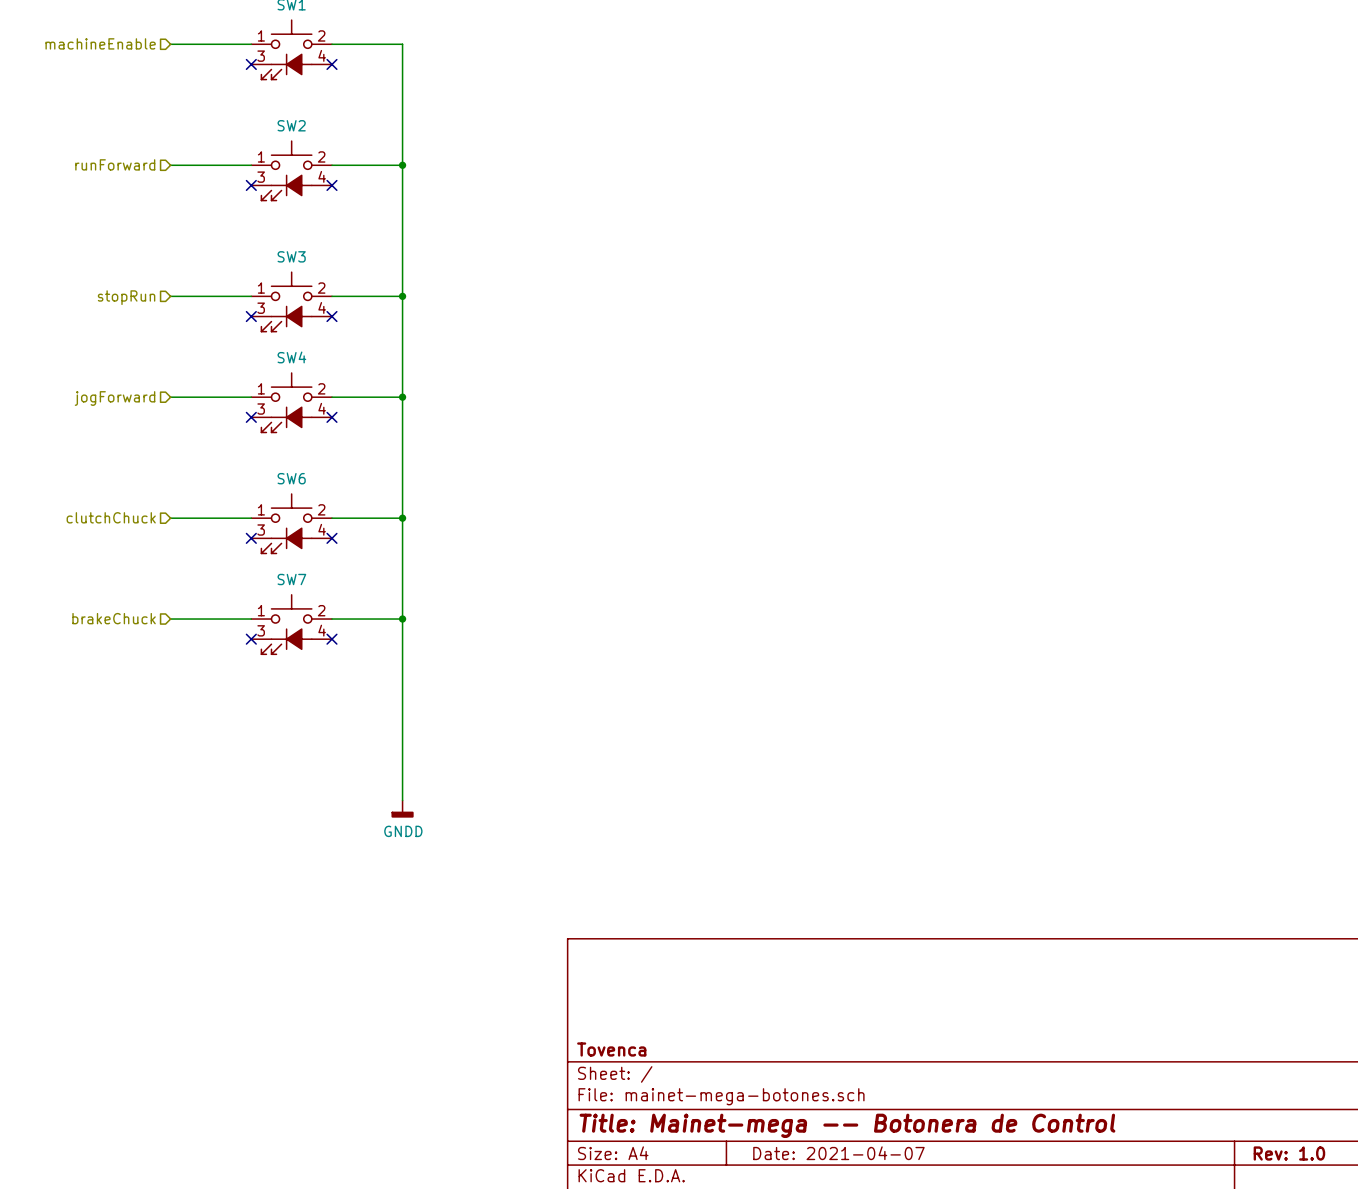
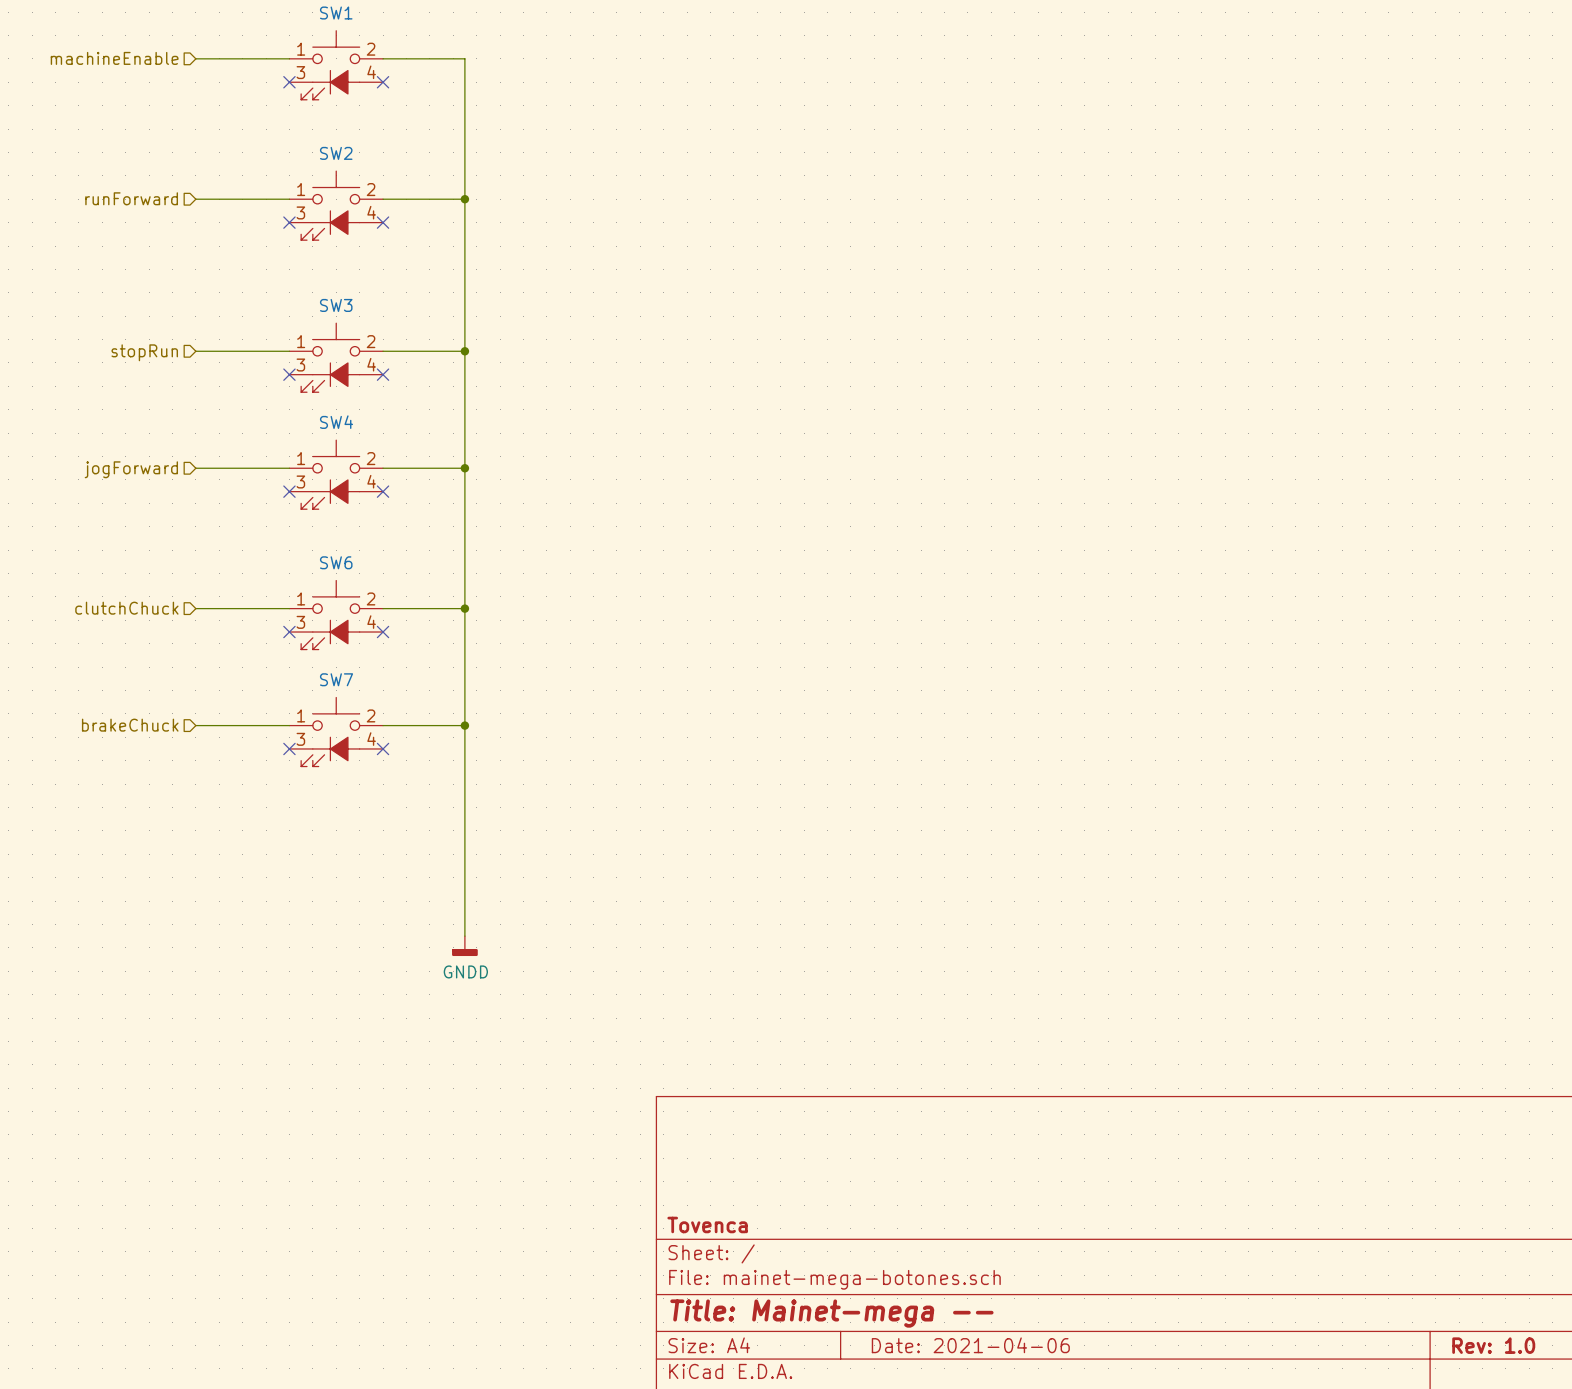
title block: Title: Mainet-mega -- Botonera de Control (847, 1125) -> Title: Mainet-mega -- (831, 1313)
title block: Date: 2021-04-07 (838, 1153) -> Date: 2021-04-06 (970, 1345)

